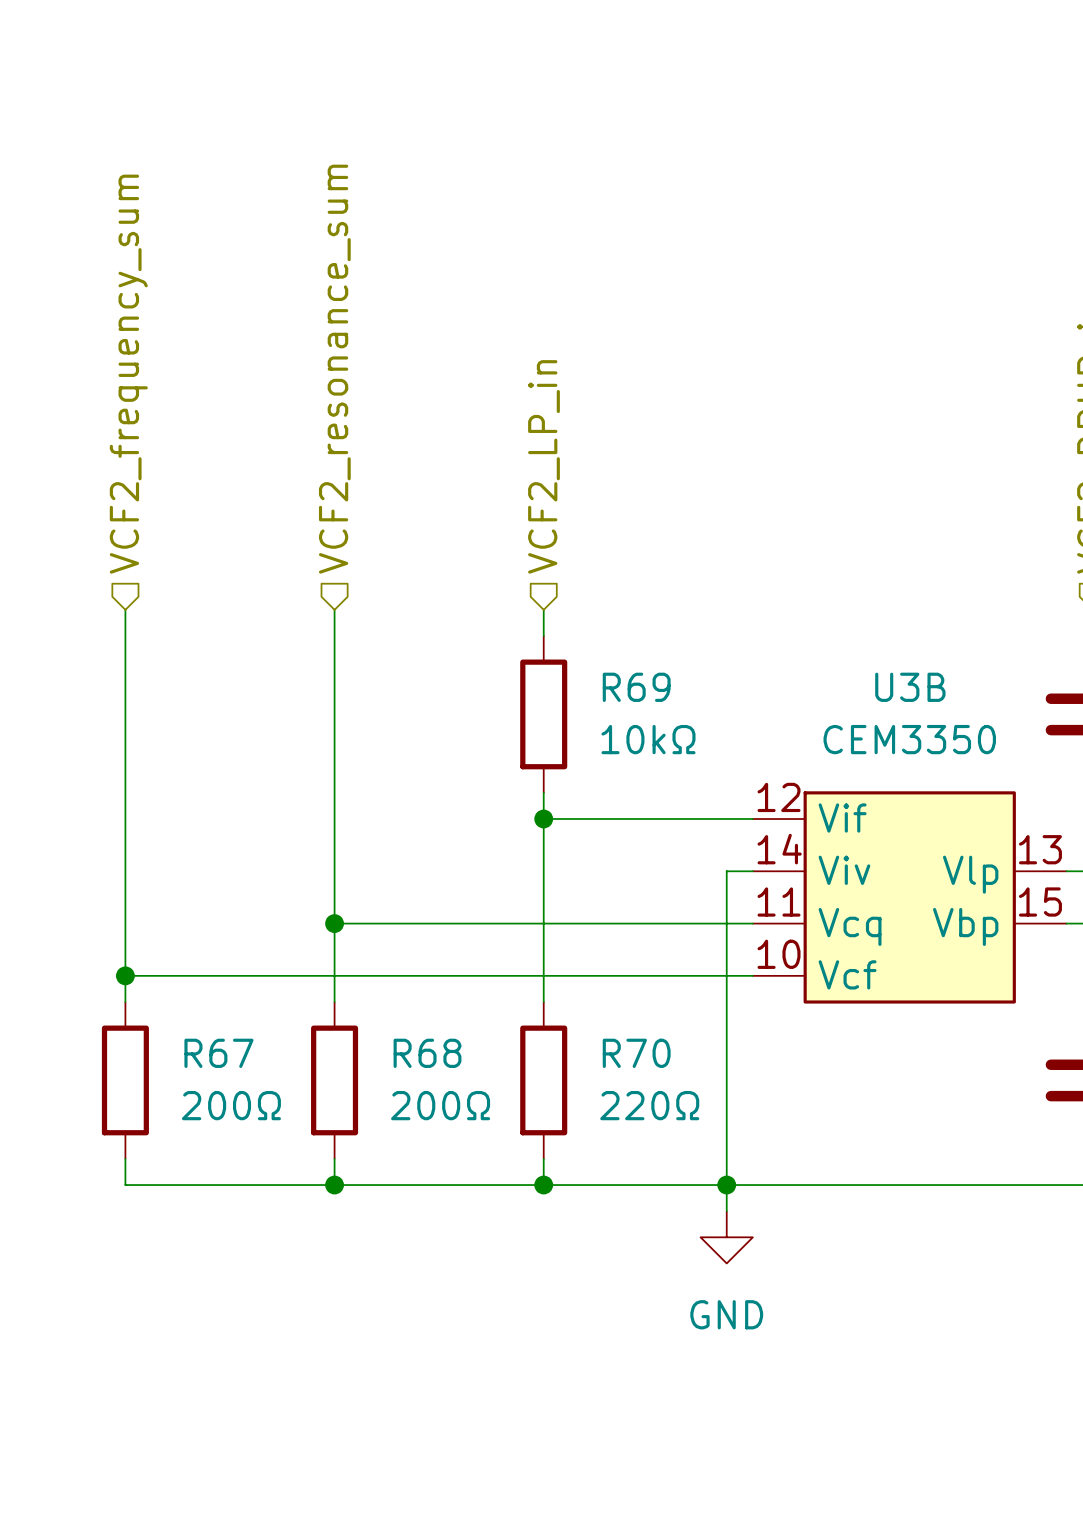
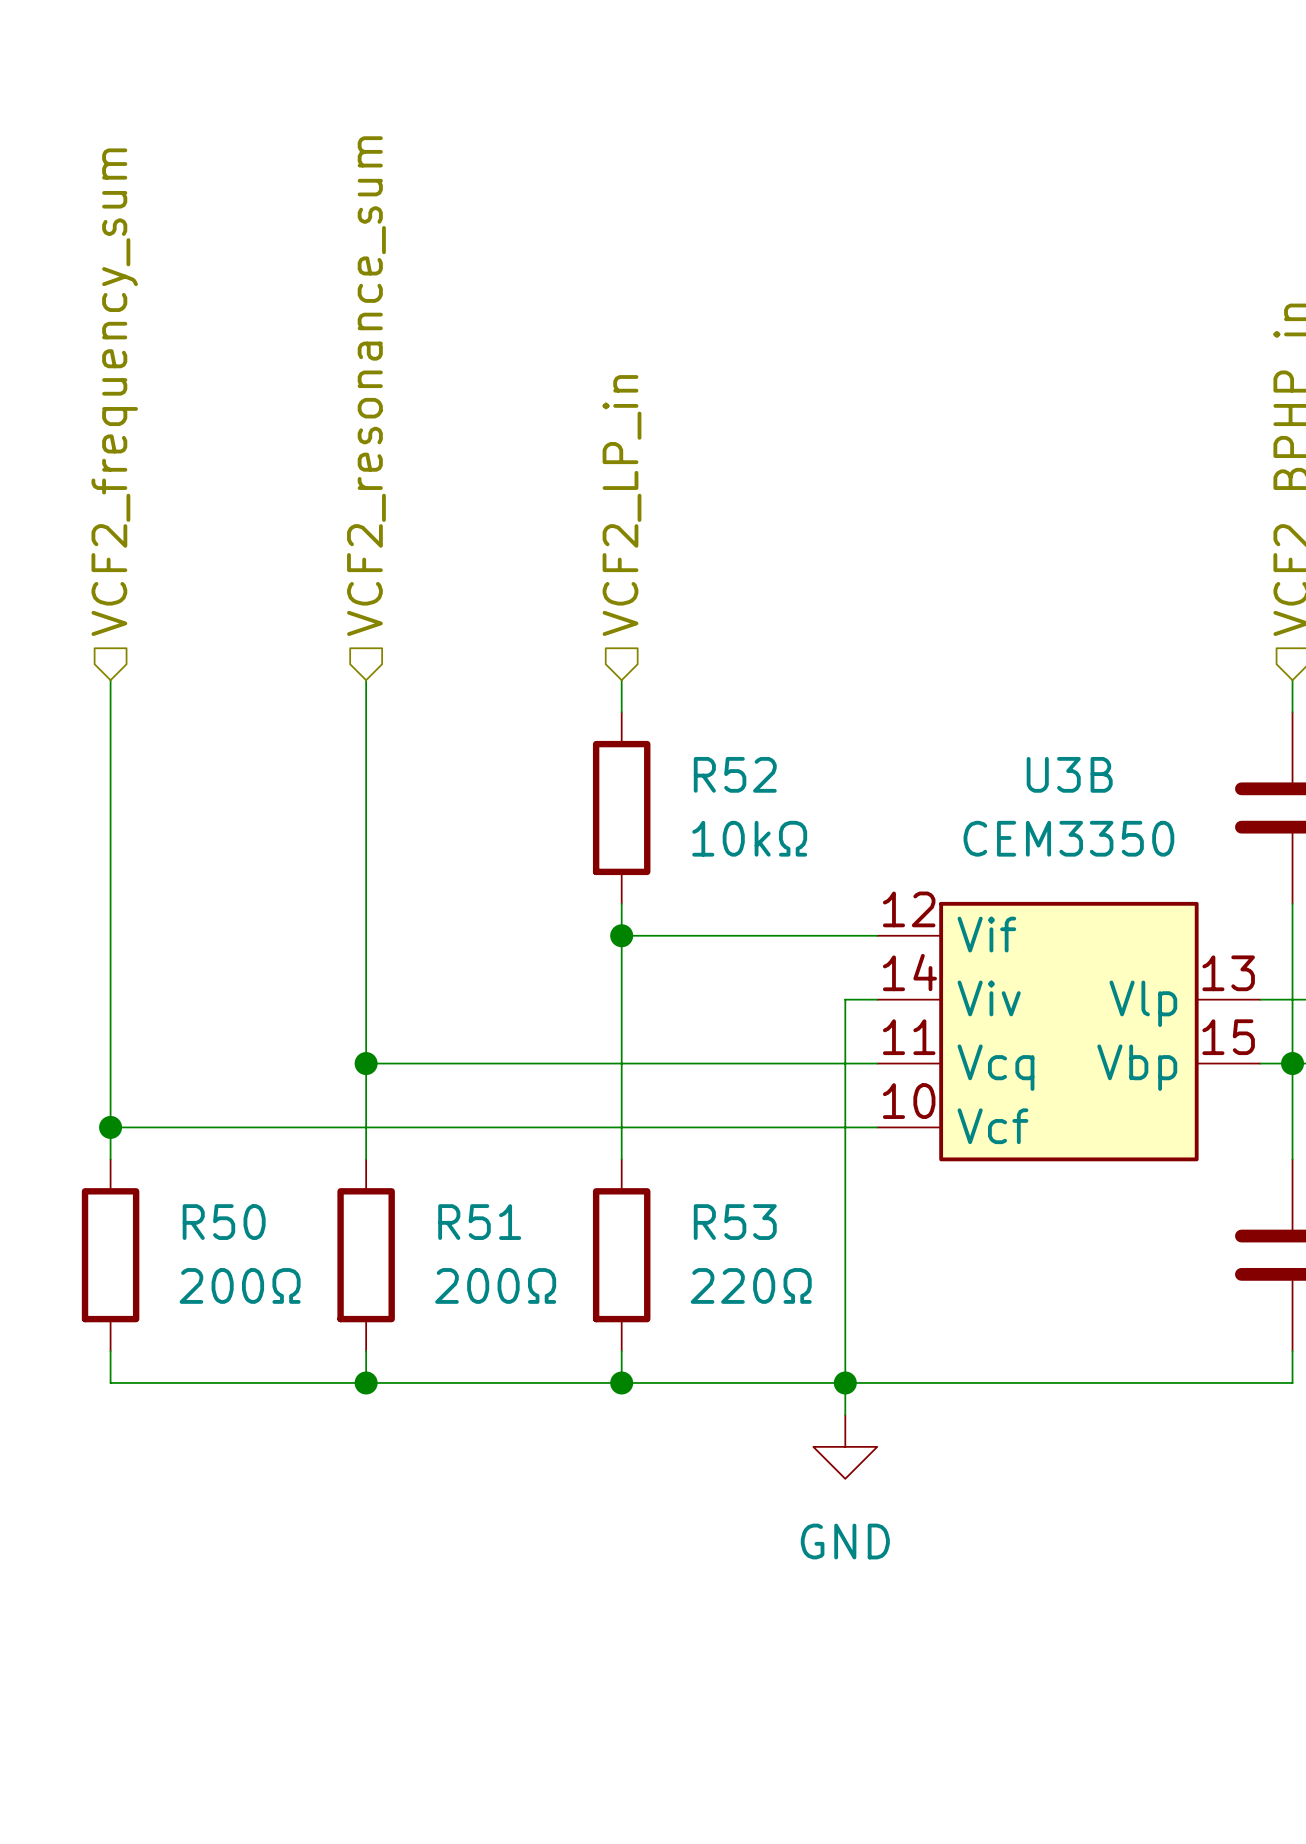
R69 name: R69 (636, 687) -> R52 (735, 774)
R67 name: R67 (218, 1053) -> R50 (224, 1222)
R68 name: R68 (427, 1053) -> R51 (479, 1222)
R70 name: R70 (636, 1053) -> R53 (735, 1222)

